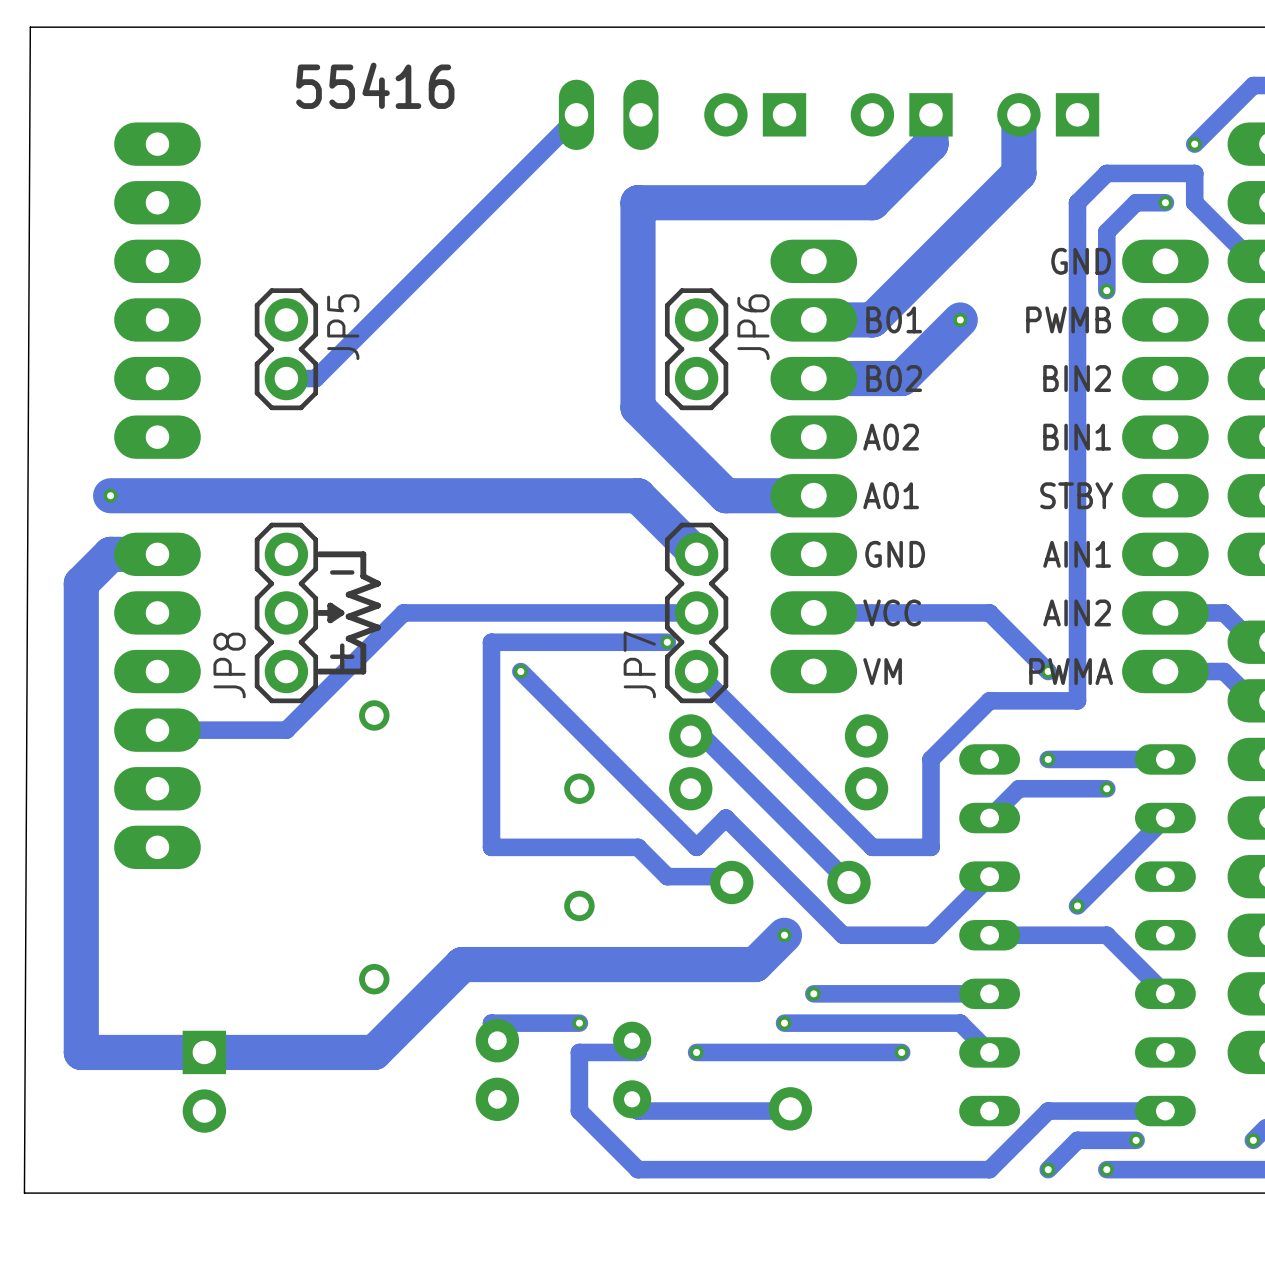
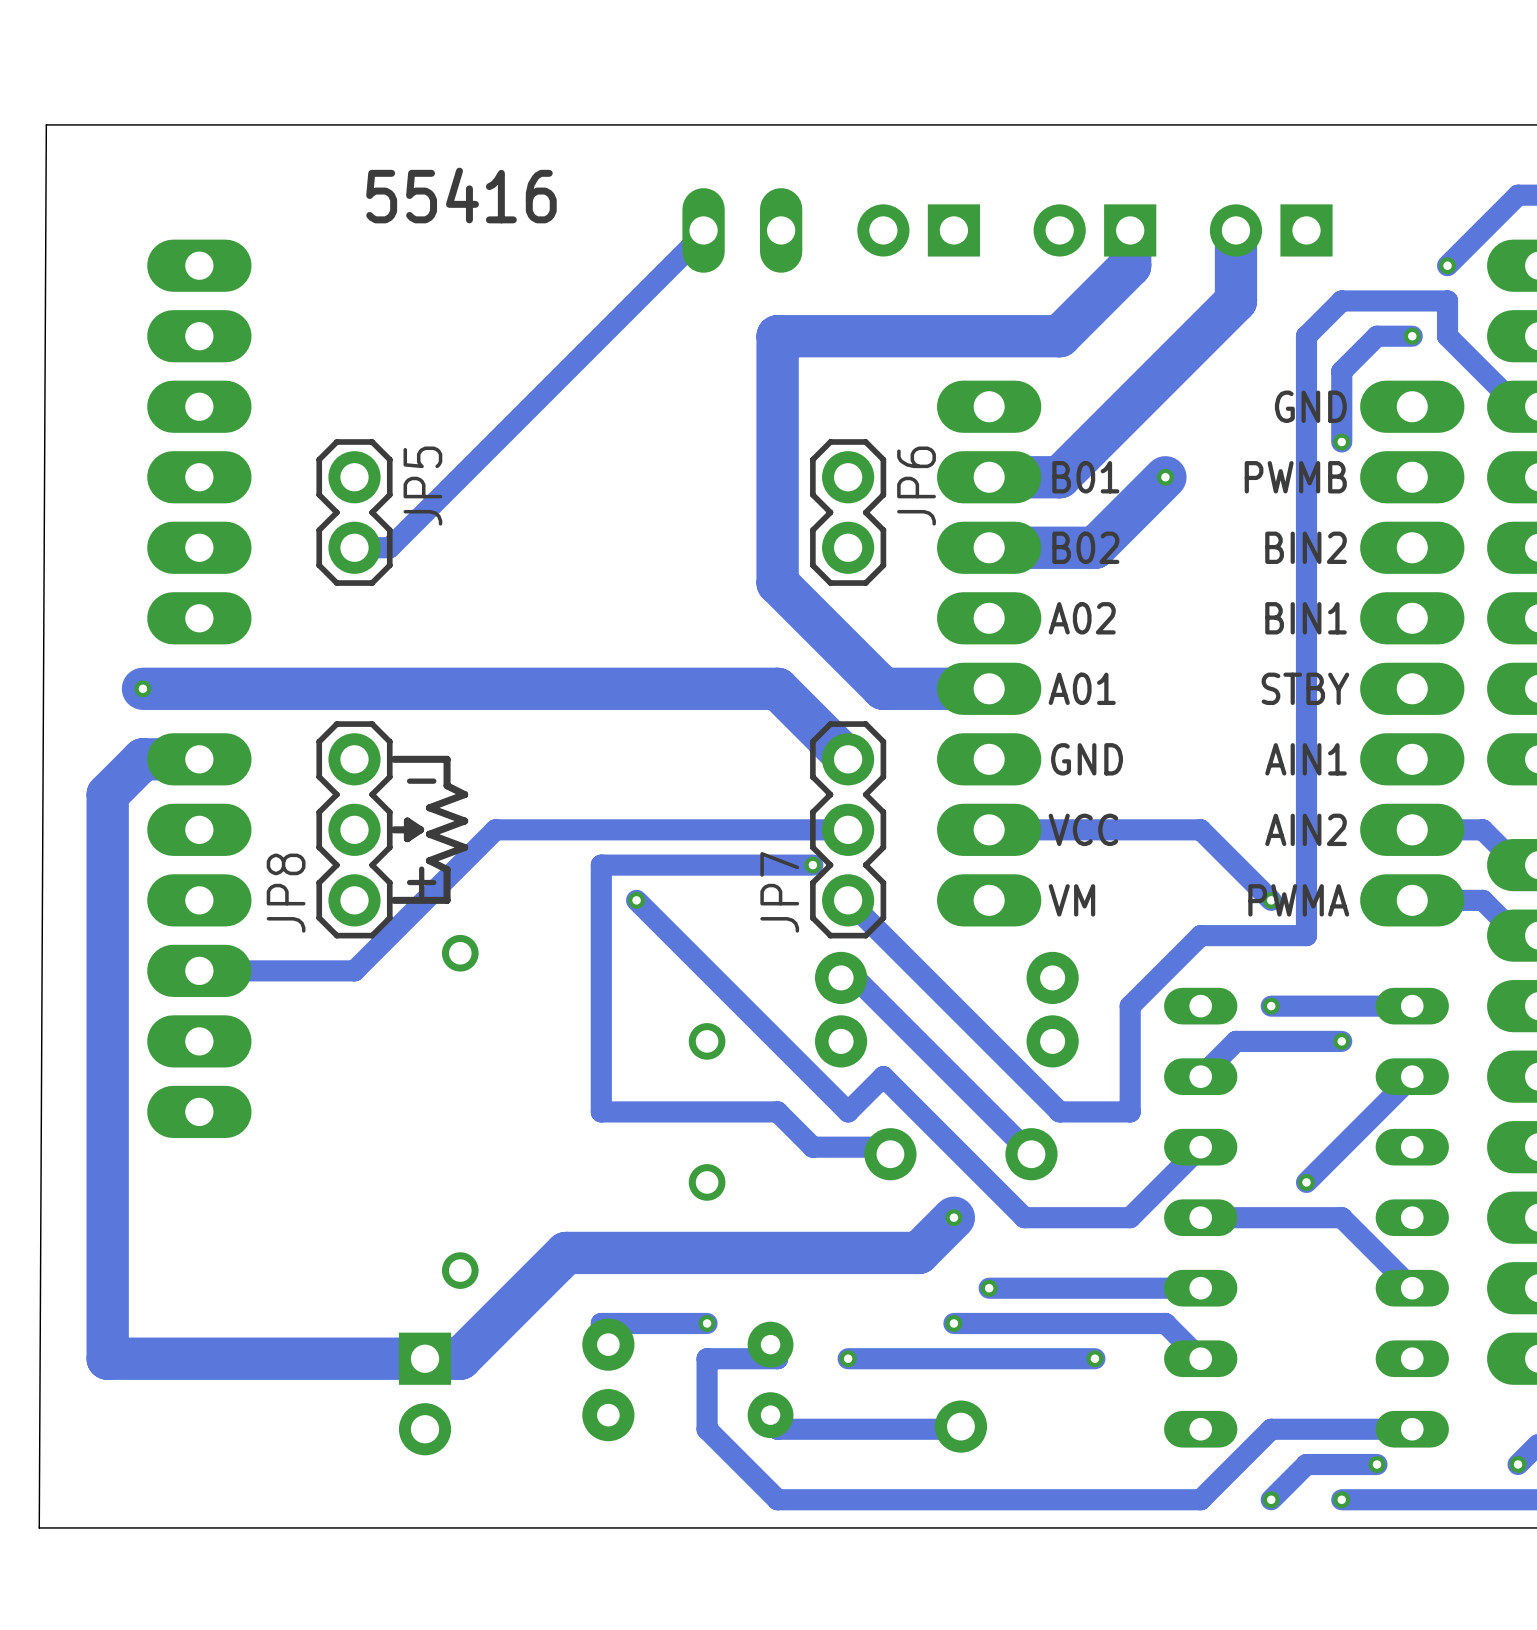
part position: (204, 1081) -> (425, 1393)

